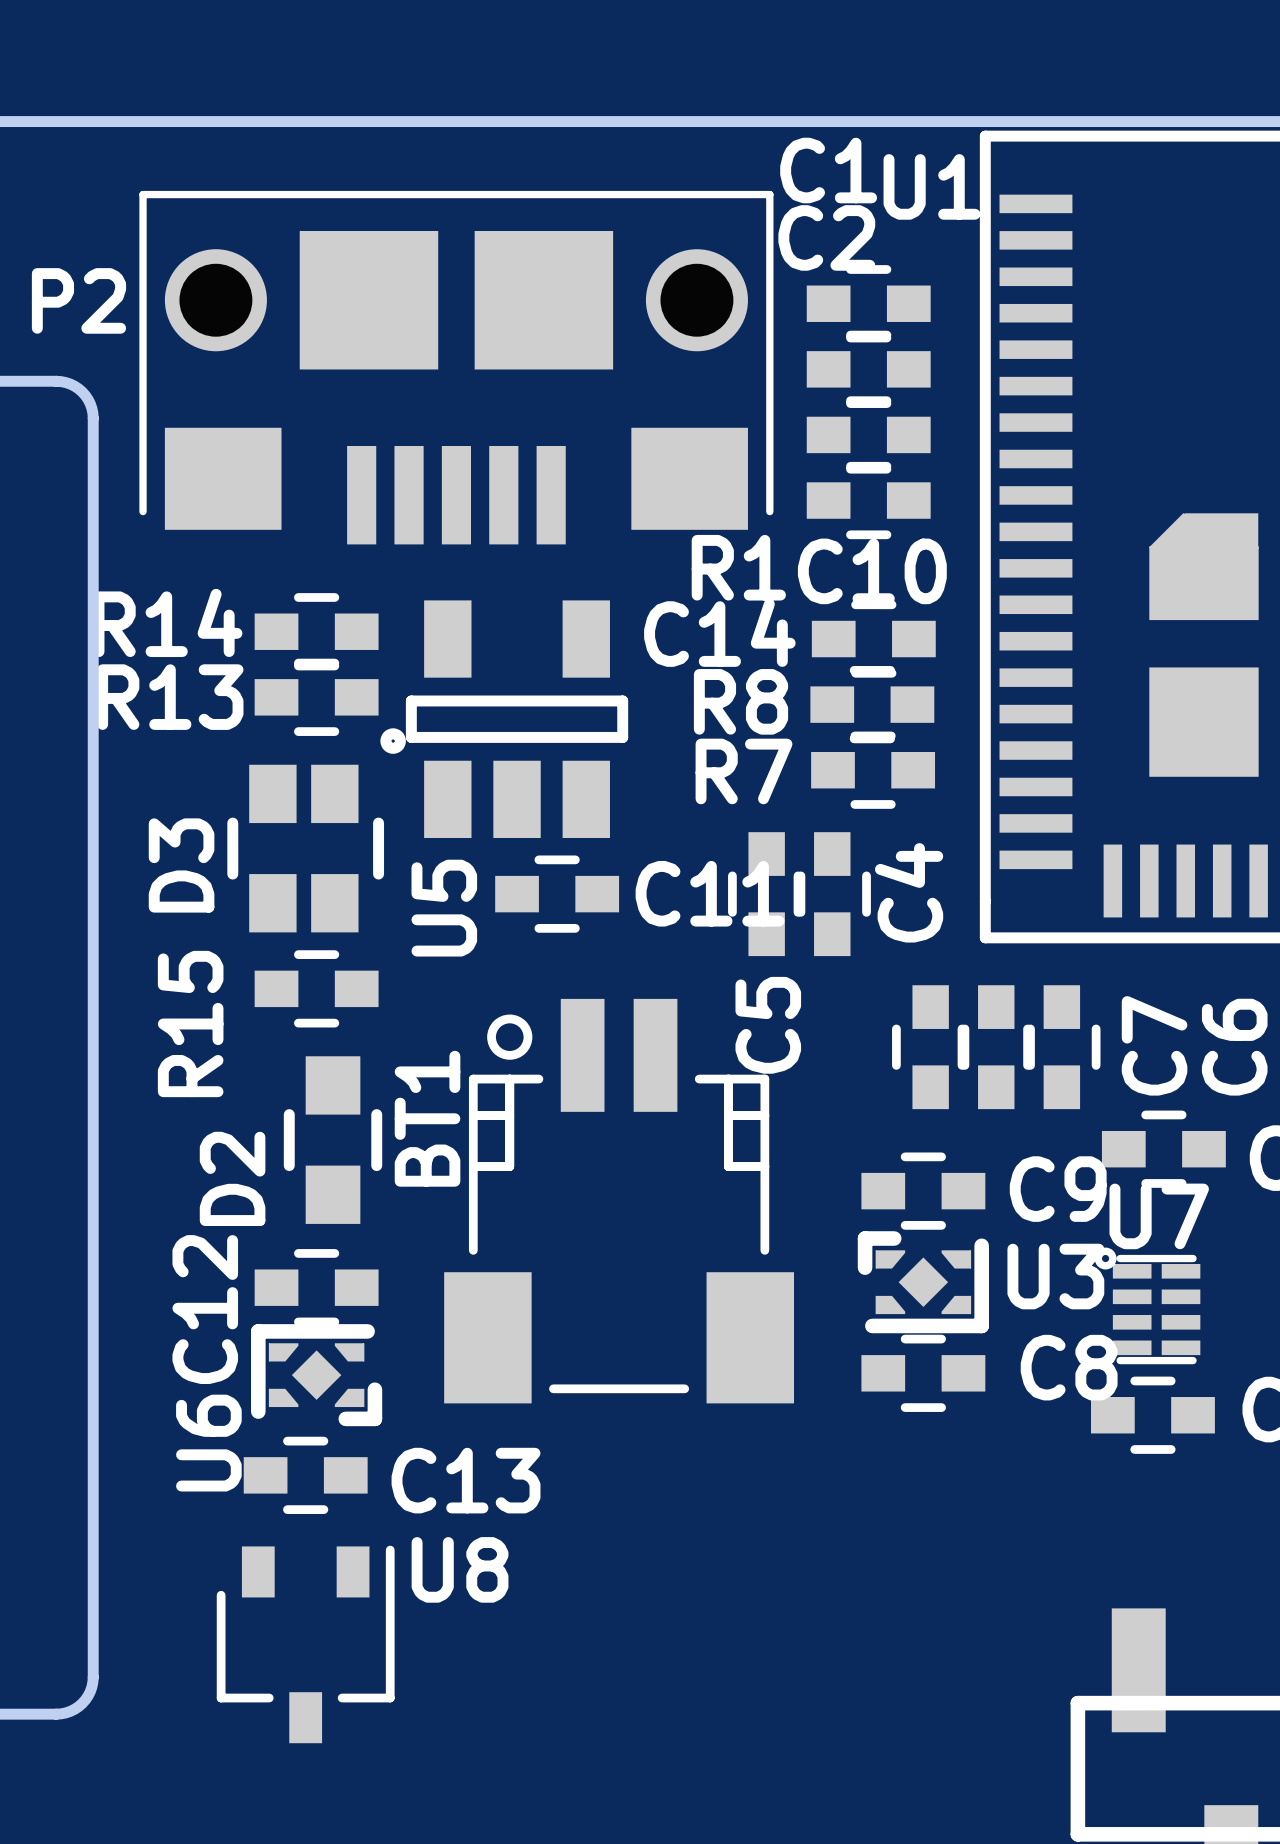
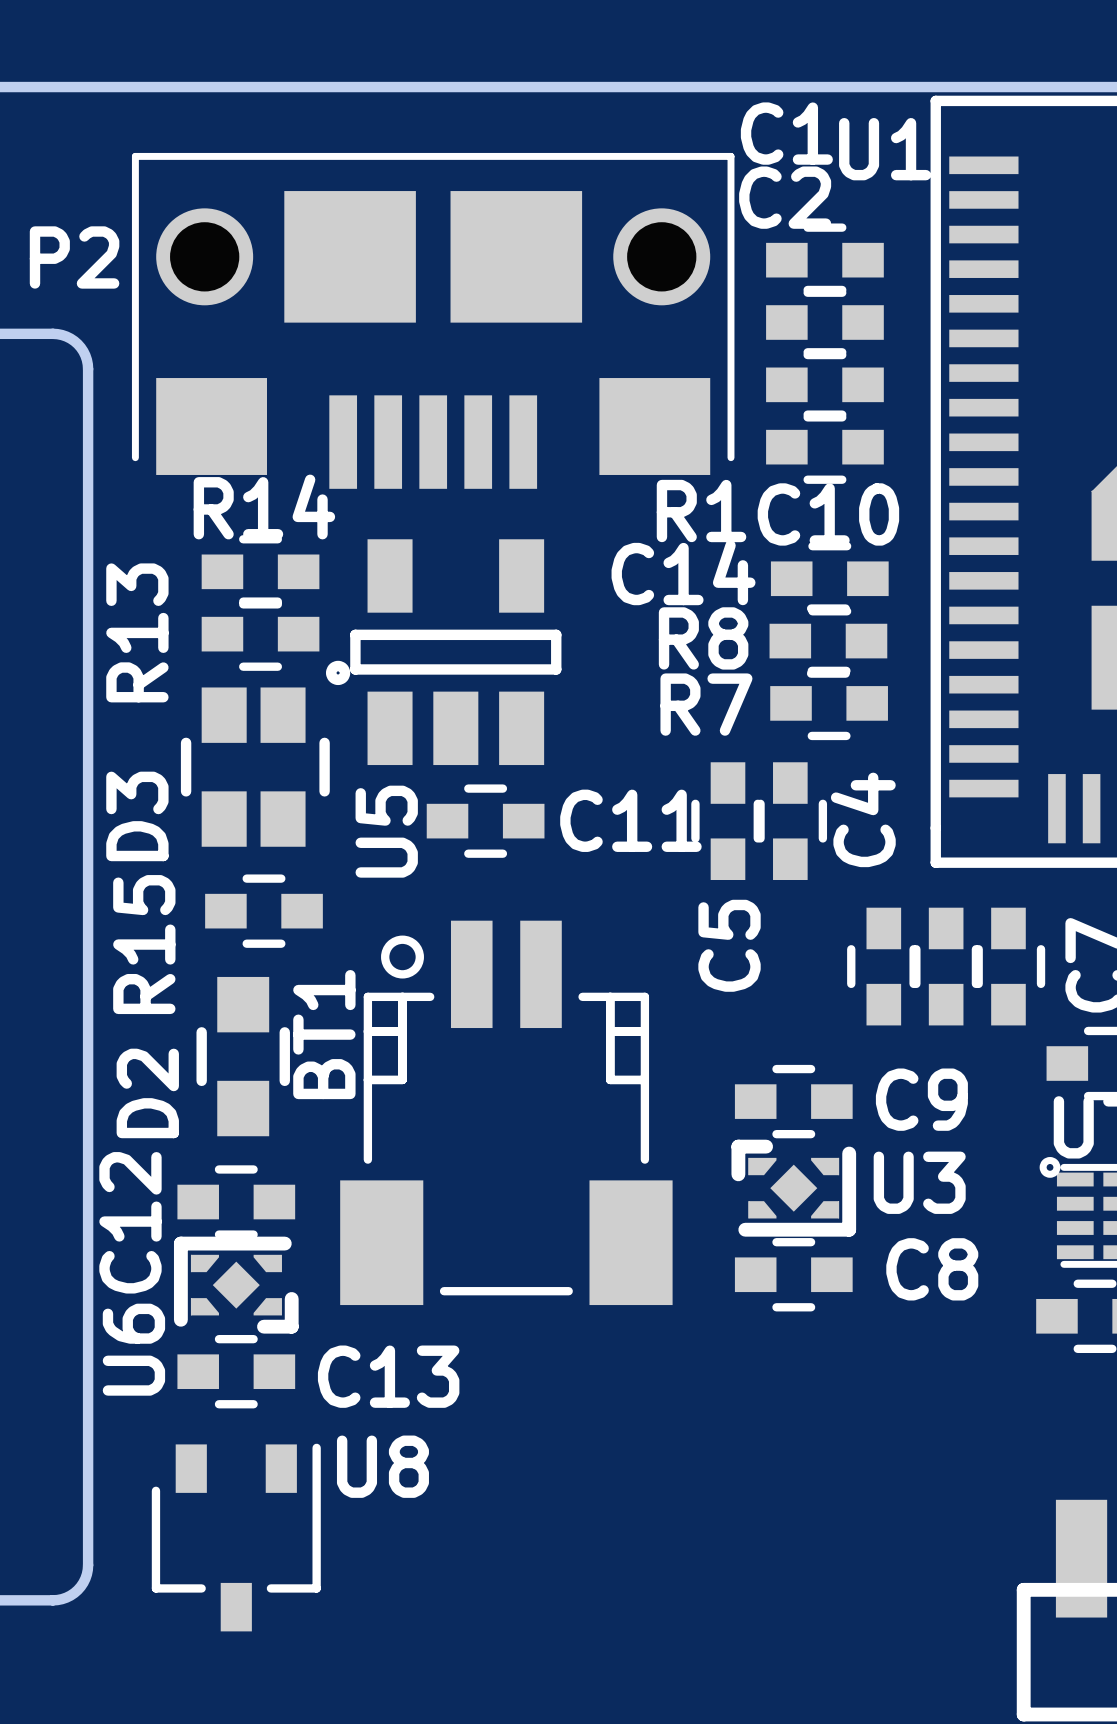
R14 name position: R14 (167, 622) -> R14 (264, 507)
R14 position: (316, 631) -> (260, 571)
R13 name rotation: 0° (170, 697) -> 90° counterclockwise (137, 632)
R13 position: (316, 697) -> (260, 634)
U5 position: (504, 719) -> (443, 652)
D3 position: (305, 848) -> (255, 767)
D3 name position: D3 (181, 865) -> D3 (137, 816)
C11 position: (557, 894) -> (485, 821)
R15 position: (316, 988) -> (264, 911)
D2 position: (333, 1140) -> (243, 1056)
C9 position: (923, 1191) -> (793, 1101)
BT1 position: (619, 1201) -> (506, 1112)
U3 position: (923, 1282) -> (793, 1188)
C12 position: (316, 1287) -> (236, 1202)
C8 position: (923, 1373) -> (793, 1274)
U6 position: (316, 1375) -> (236, 1285)
C13 position: (305, 1475) -> (236, 1371)
U8 position: (305, 1644) -> (236, 1537)

